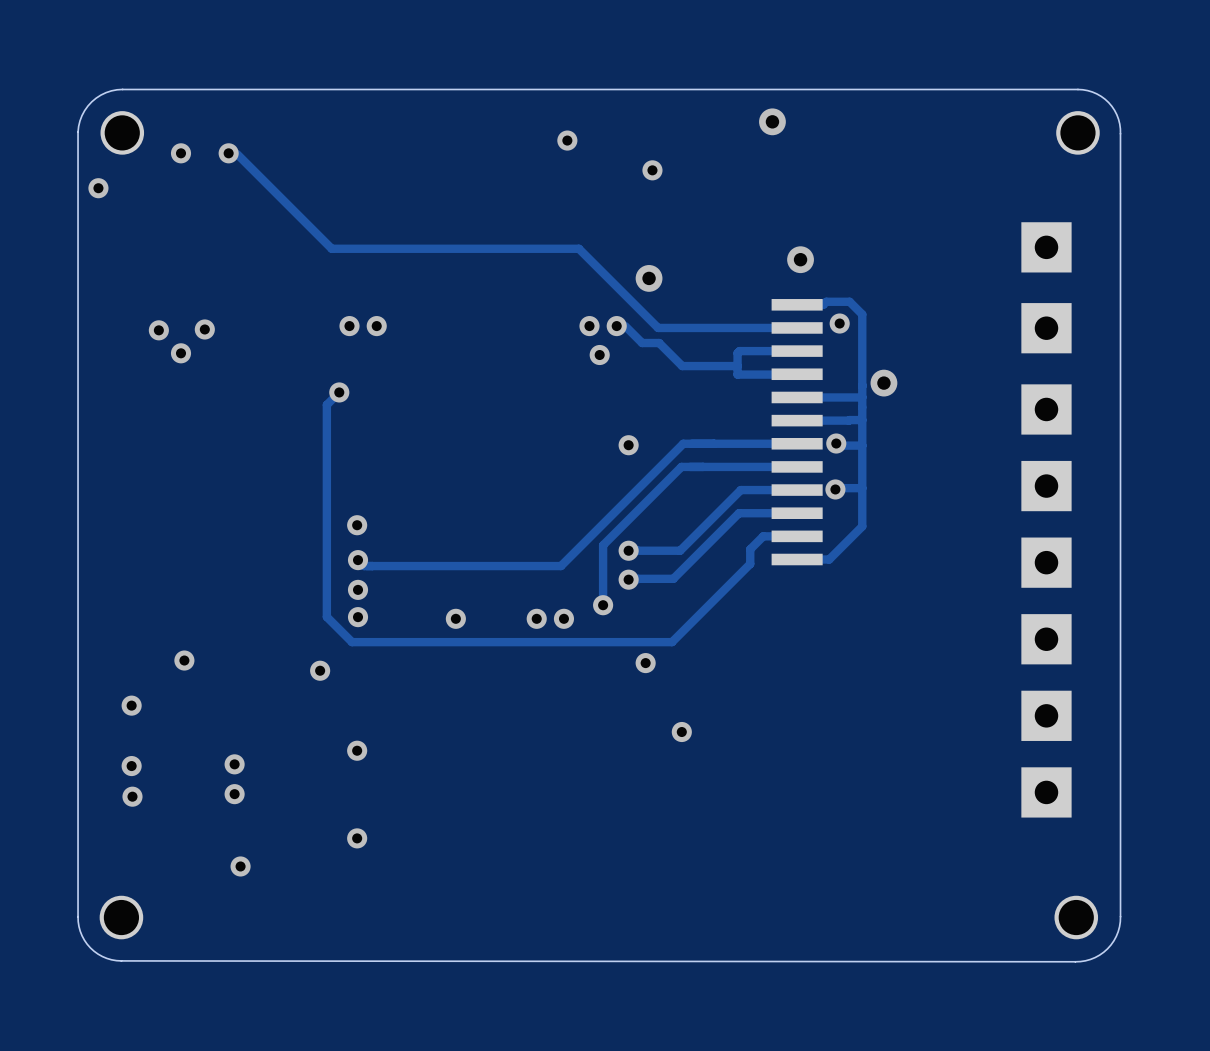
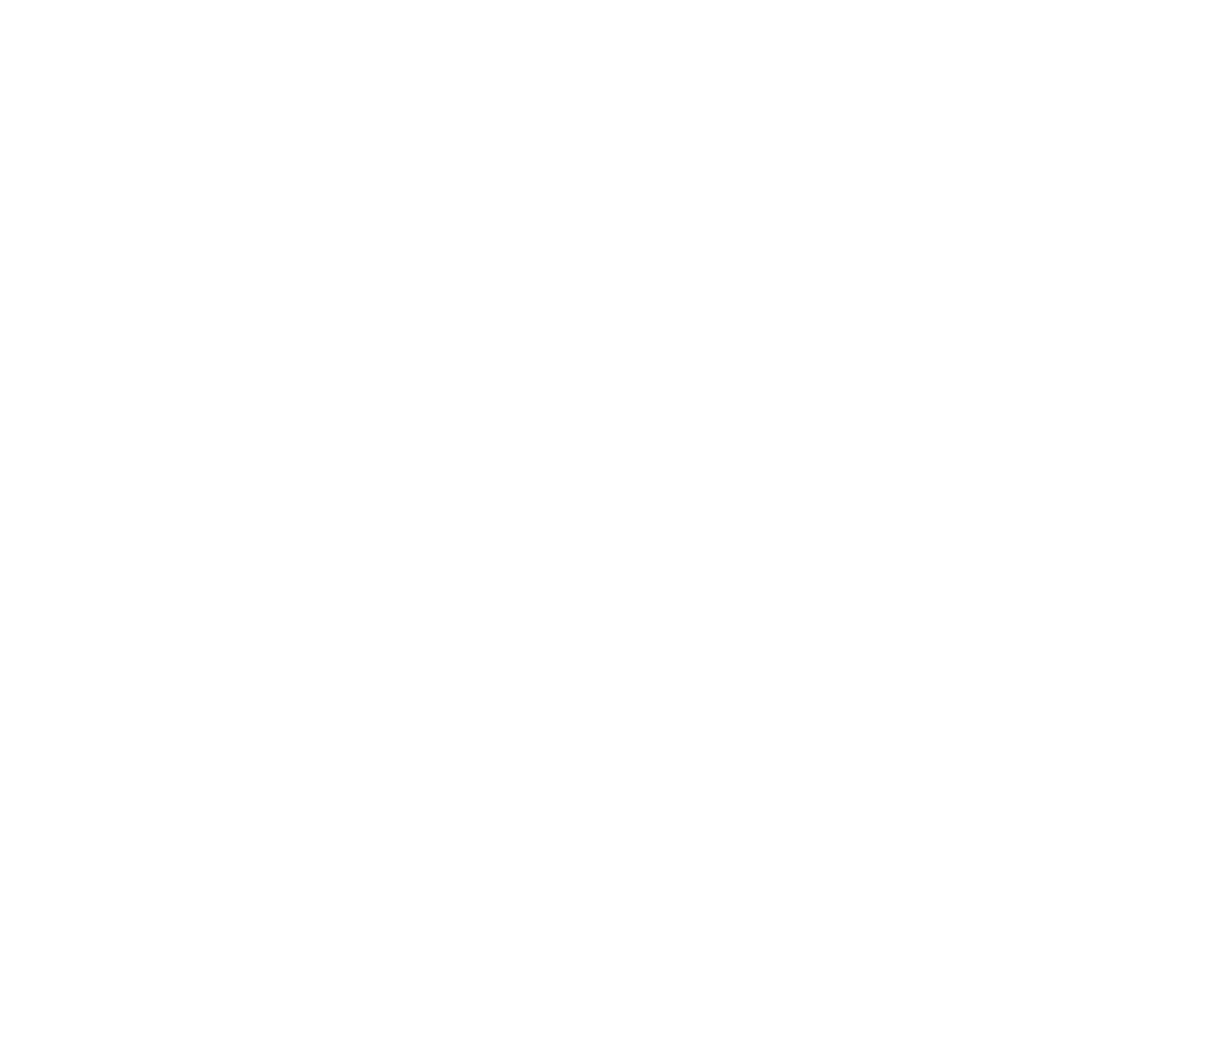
board edge: (1077, 89) (122, 89) (106, 92) (91, 101) (82, 115) (78, 132) (78, 916) (80, 931) (87, 944) (102, 956) (121, 960) (1075, 961) (1090, 959) (1103, 952) (1116, 936) (1120, 916) (1120, 128) (1116, 114) (1105, 99) (1092, 92) (1077, 89) -> none
via: (772, 121) -> none
part: (122, 132) -> none
part: (1077, 132) -> none
via: (567, 140) -> none
via: (181, 153) -> none
via: (228, 153) -> none
track: (237, 154) (331, 248) (578, 248) (658, 327) (797, 327) -> none
via: (652, 170) -> none
via: (98, 188) -> none
part: (1046, 247) -> none
via: (800, 259) -> none
via: (649, 278) -> none
track: (797, 304) (823, 304) (826, 301) (849, 301) (862, 314) (862, 526) (829, 559) (797, 559) -> none
via: (839, 323) -> none
via: (349, 326) -> none
via: (376, 326) -> none
via: (589, 326) -> none
via: (616, 326) -> none
track: (625, 326) (642, 343) (659, 343) (682, 366) (737, 366) -> none
part: (1046, 328) -> none
via: (204, 329) -> none
via: (158, 330) -> none
track: (797, 351) (739, 351) (737, 353) (737, 374) (796, 374) -> none
via: (181, 353) -> none
via: (599, 355) -> none
via: (883, 383) -> none
track: (339, 392) (326, 404) (326, 616) (352, 642) (672, 642) (750, 563) (750, 549) (763, 536) (797, 536) -> none
via: (339, 392) -> none
track: (861, 397) (797, 397) -> none
part: (1046, 409) -> none
track: (862, 420) (797, 420) -> none
part: (797, 432) -> none
track: (797, 443) (683, 443) (561, 566) (363, 566) (358, 560) -> none
via: (836, 443) -> none
track: (839, 443) (841, 445) (862, 445) -> none
via: (628, 445) -> none
track: (797, 466) (681, 466) (603, 545) (603, 605) -> none
part: (1046, 486) -> none
track: (862, 488) (839, 489) -> none
via: (835, 489) -> none
track: (797, 490) (740, 490) (680, 550) (637, 550) -> none
track: (797, 513) (738, 513) (673, 578) (637, 579) -> none
via: (357, 525) -> none
via: (628, 550) -> none
via: (358, 560) -> none
part: (1046, 562) -> none
via: (628, 579) -> none
via: (358, 589) -> none
via: (603, 605) -> none
via: (358, 617) -> none
via: (455, 618) -> none
via: (536, 618) -> none
via: (563, 618) -> none
part: (1046, 639) -> none
via: (184, 660) -> none
via: (645, 663) -> none
via: (320, 670) -> none
via: (131, 705) -> none
part: (1046, 715) -> none
via: (681, 732) -> none
via: (357, 750) -> none
via: (234, 764) -> none
via: (131, 766) -> none
part: (1046, 792) -> none
via: (234, 794) -> none
via: (132, 796) -> none
via: (357, 838) -> none
via: (240, 866) -> none
part: (121, 917) -> none
part: (1076, 917) -> none

